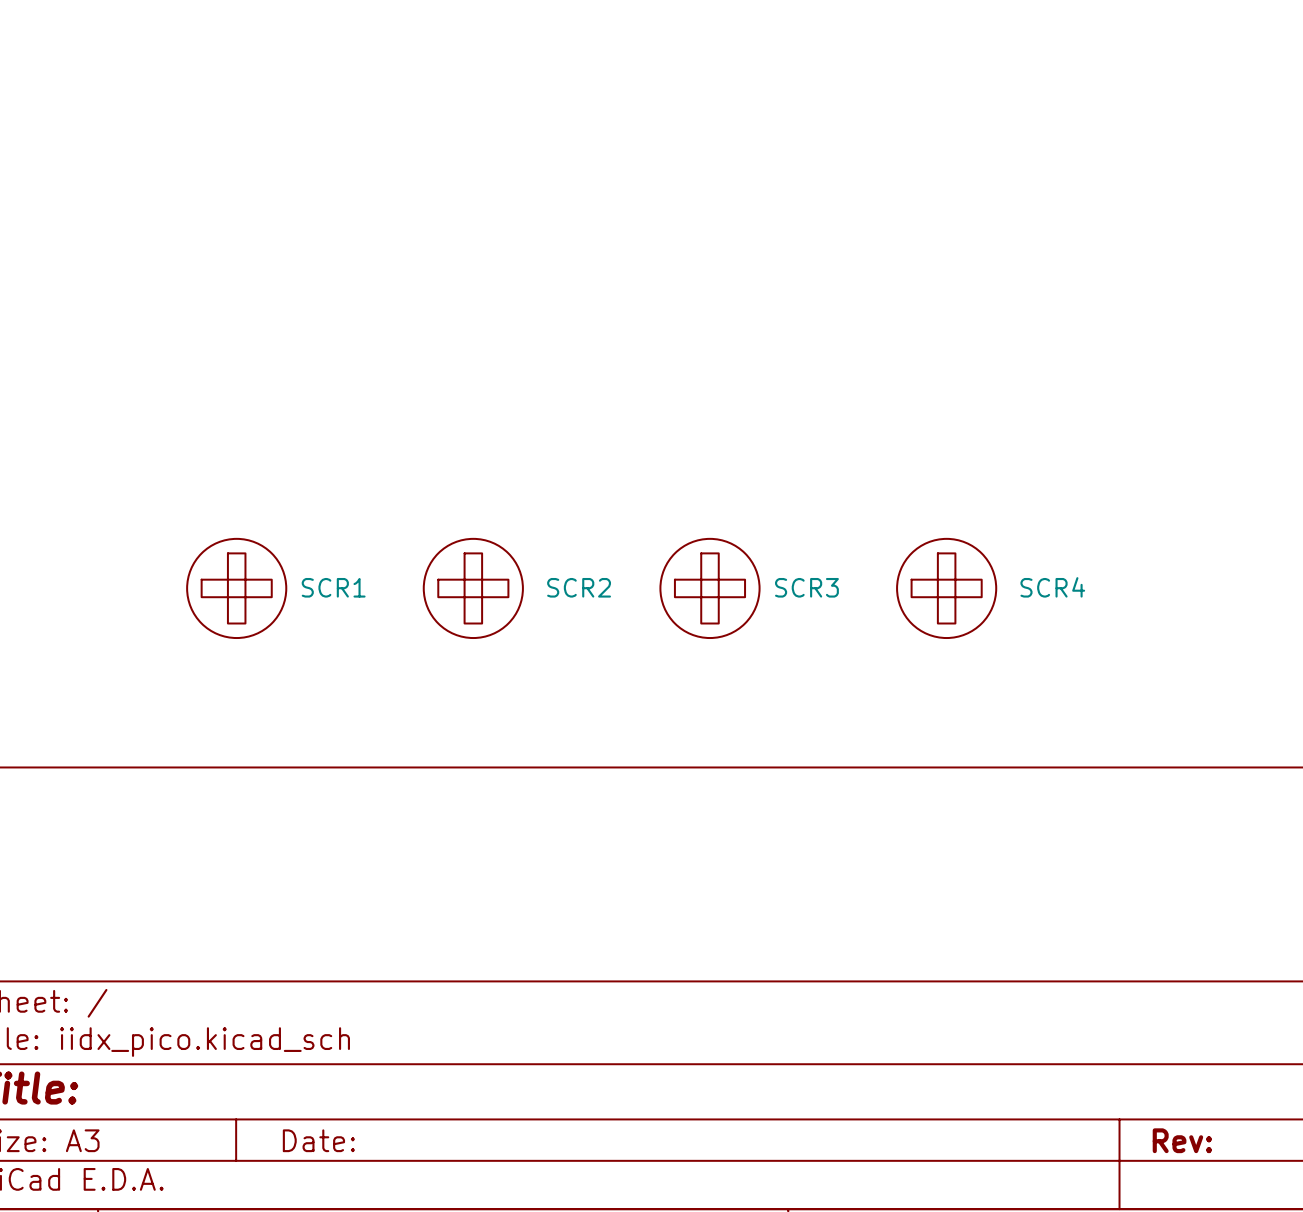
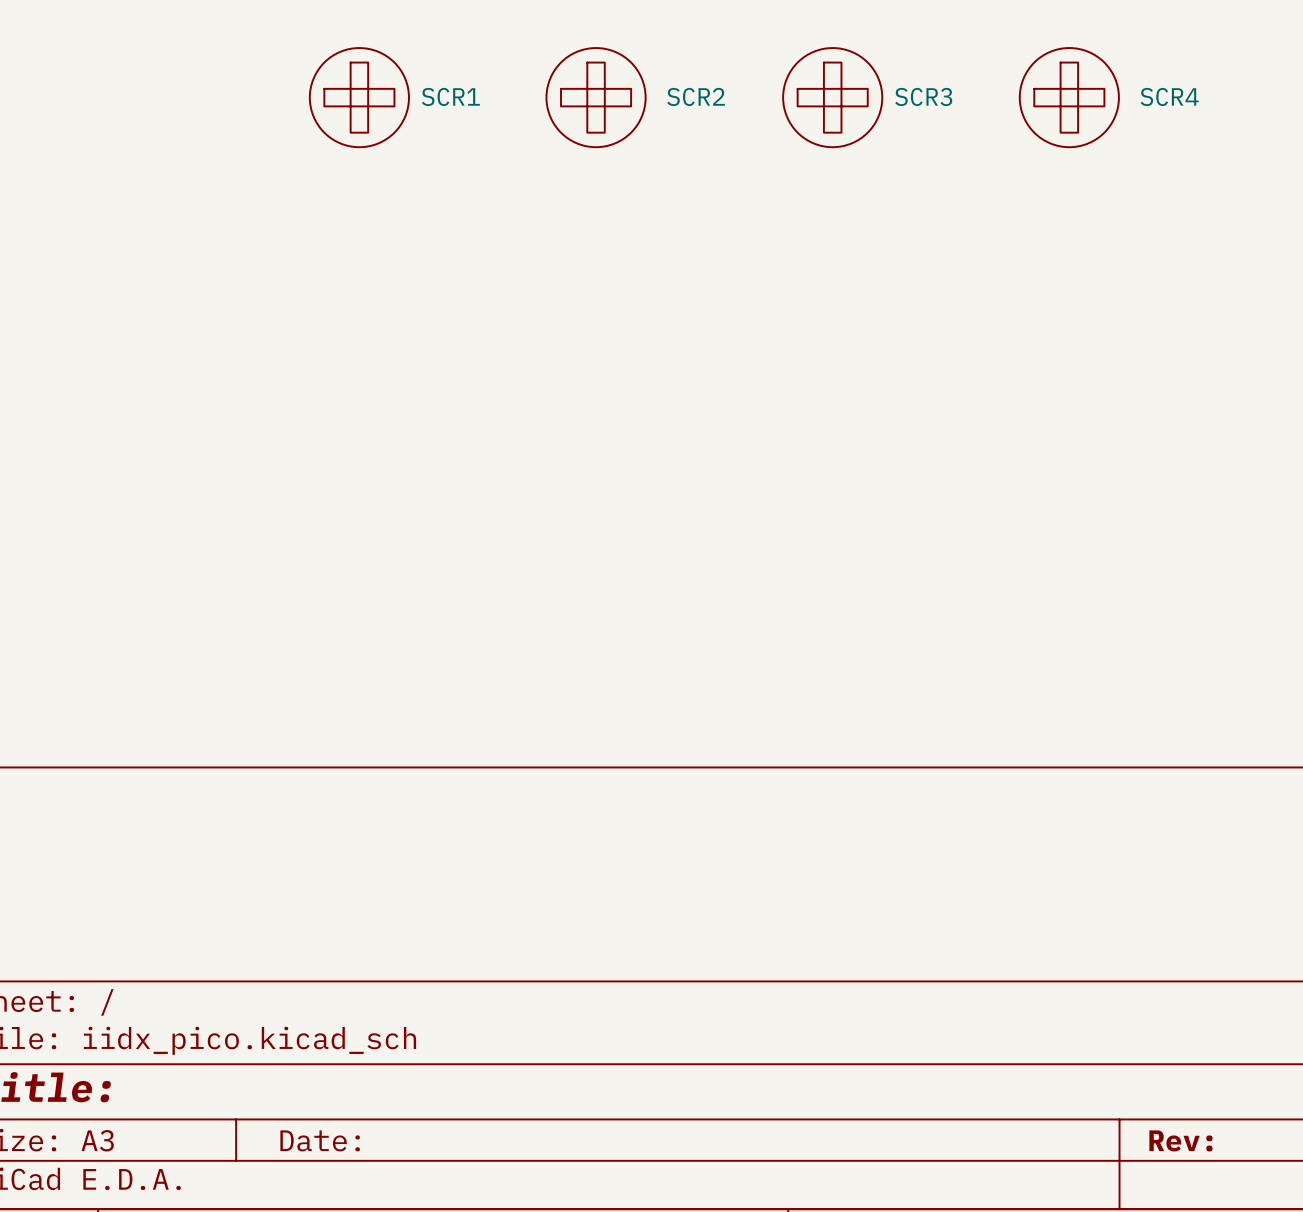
SCR1 position: (236, 588) -> (359, 97)
SCR2 position: (473, 588) -> (596, 97)
SCR3 position: (709, 588) -> (832, 97)
SCR4 position: (946, 588) -> (1069, 97)

